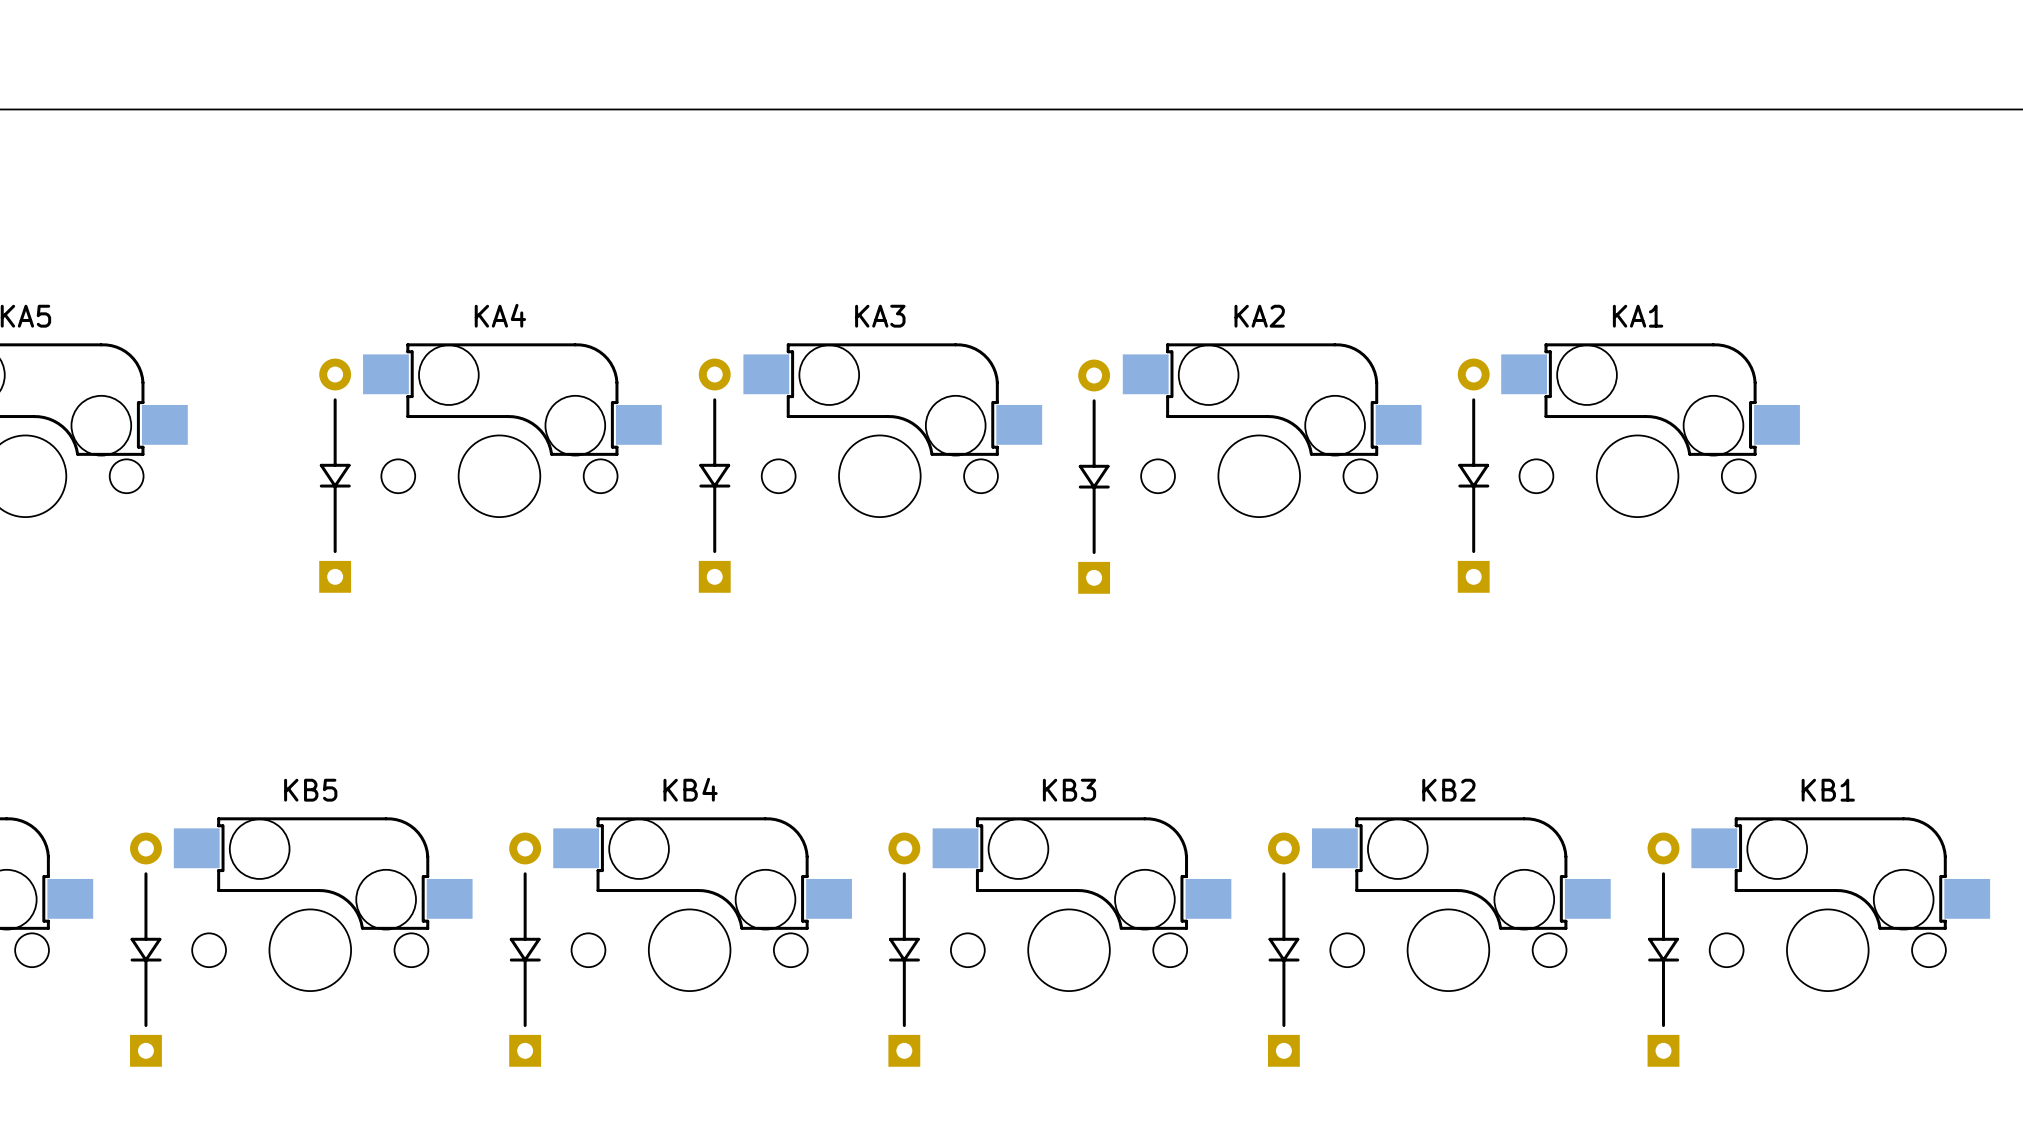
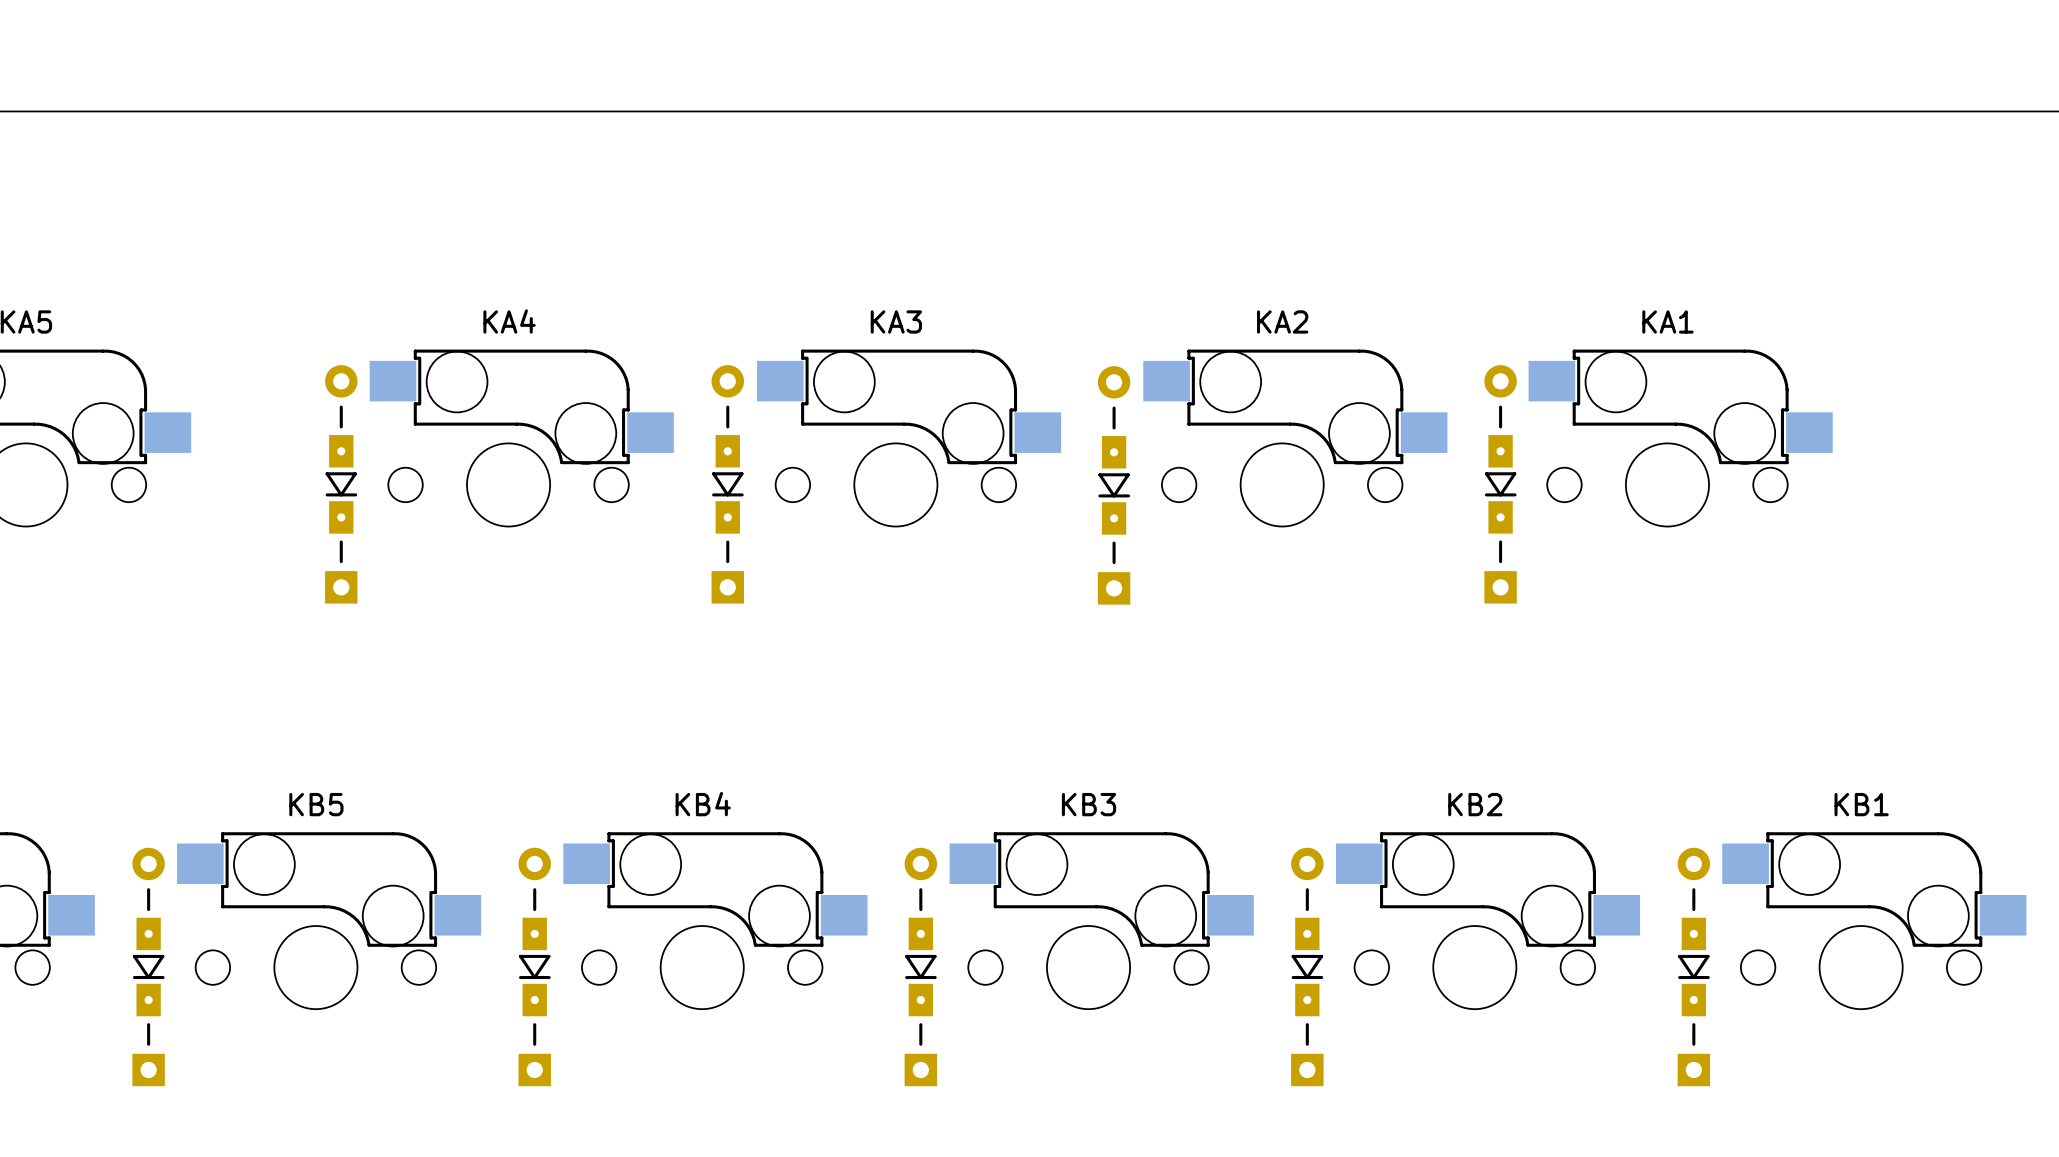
part footprint: [319, 358, 352, 593] -> [325, 365, 358, 604]
part footprint: [698, 358, 731, 593] -> [711, 365, 744, 604]
part footprint: [1457, 358, 1490, 593] -> [1484, 365, 1517, 604]
part footprint: [1078, 359, 1111, 594] -> [1097, 366, 1131, 605]
part footprint: [130, 832, 162, 1067] -> [132, 847, 165, 1087]
part footprint: [509, 832, 542, 1067] -> [518, 847, 551, 1087]
part footprint: [888, 832, 921, 1067] -> [904, 847, 938, 1087]
part footprint: [1267, 832, 1300, 1067] -> [1291, 847, 1324, 1087]
part footprint: [1647, 832, 1680, 1067] -> [1677, 847, 1711, 1087]

